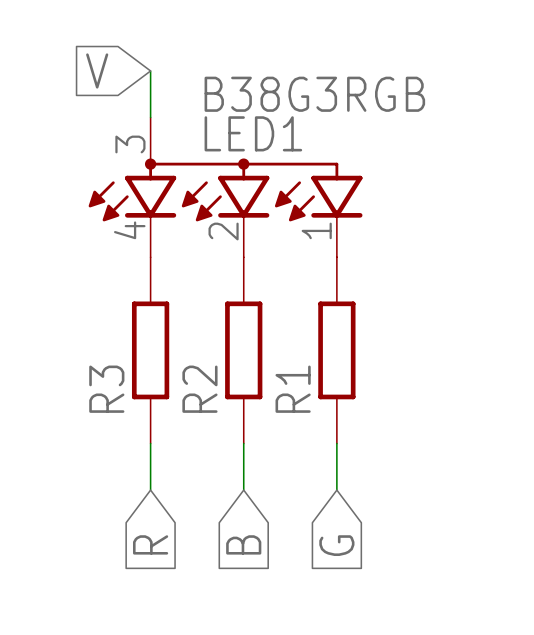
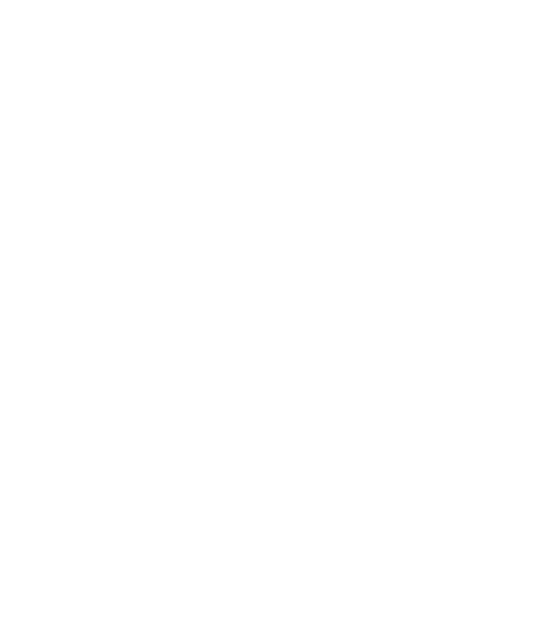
global label: V (97, 70) -> none
wire: (150, 70) (150, 117) -> none
LED1: B38G3RGB (225, 187) -> none
R3: (150, 350) -> none
R2: (243, 350) -> none
R1: (336, 350) -> none
wire: (150, 443) (150, 490) -> none
wire: (243, 443) (243, 490) -> none
wire: (336, 443) (336, 490) -> none
global label: R (150, 544) -> none
global label: B (243, 544) -> none
global label: G (336, 545) -> none

